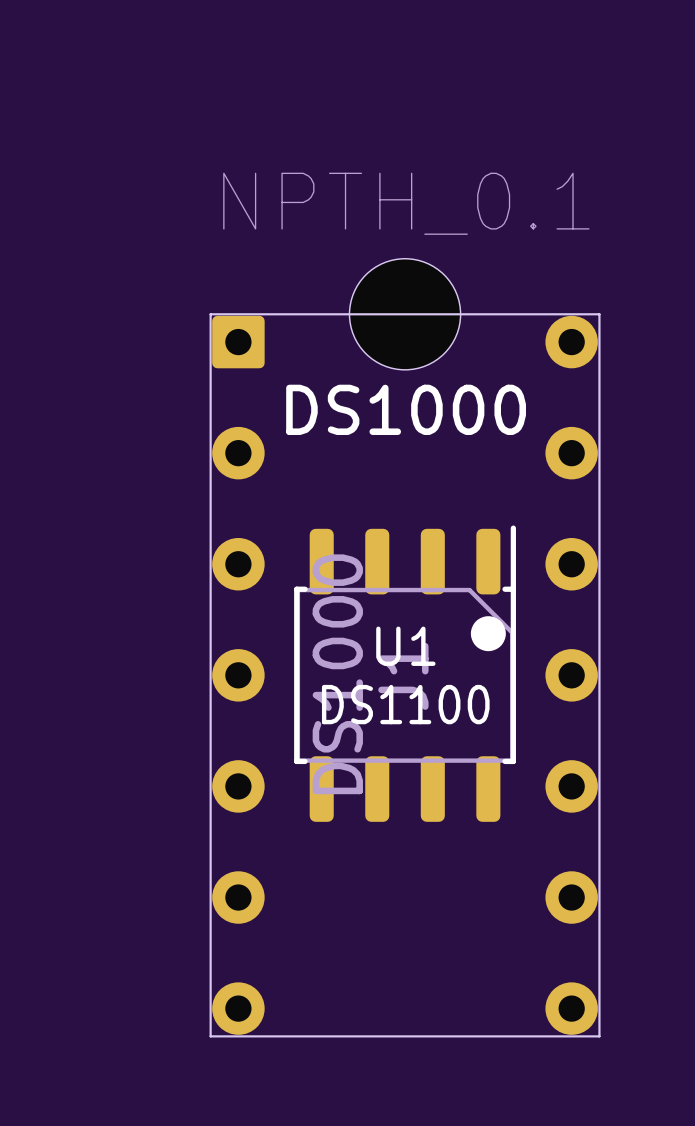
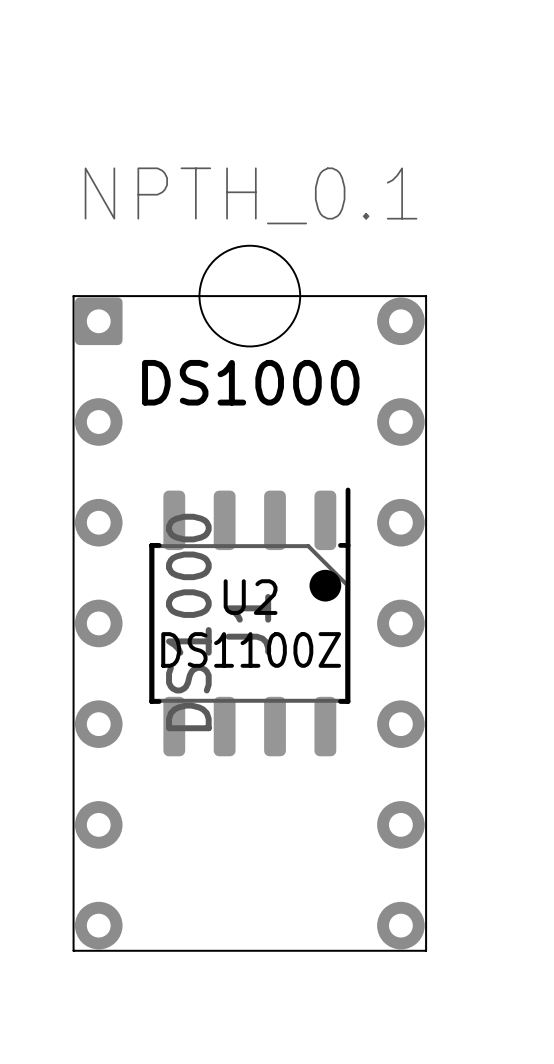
U1 name: U1 (405, 646) -> U2 (250, 597)
U1 value: DS1100 (405, 704) -> DS1100Z (251, 649)

